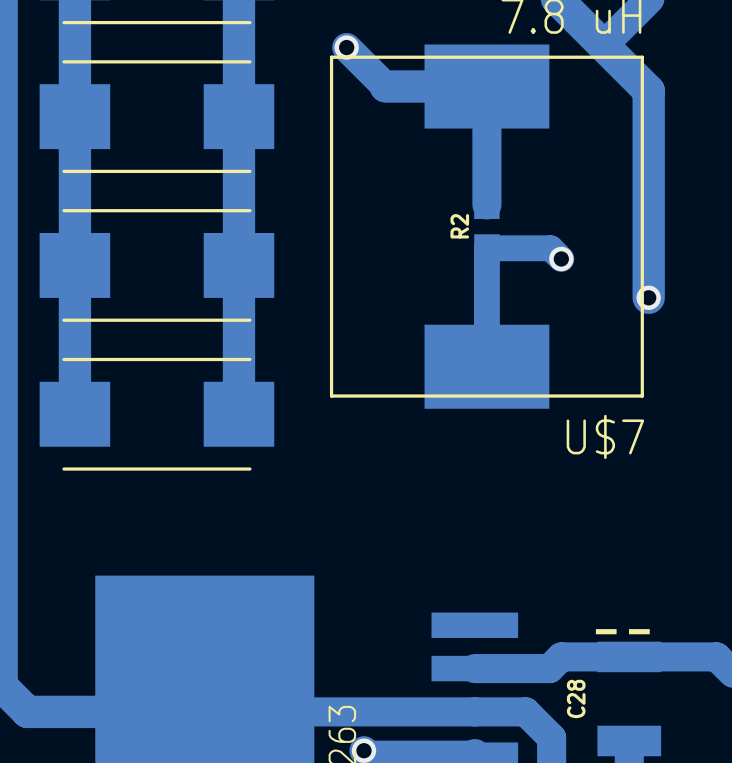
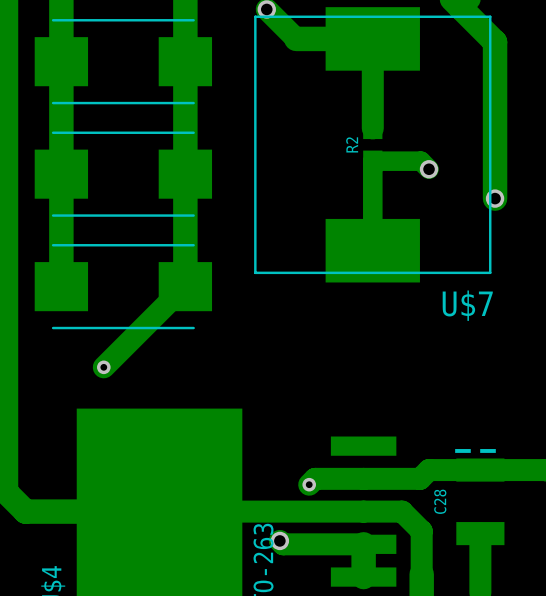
track: none -> (185, 286) (103, 367)
via: none -> (103, 367)
track: none -> (363, 478) (315, 478) (309, 484)
via: none -> (309, 484)

